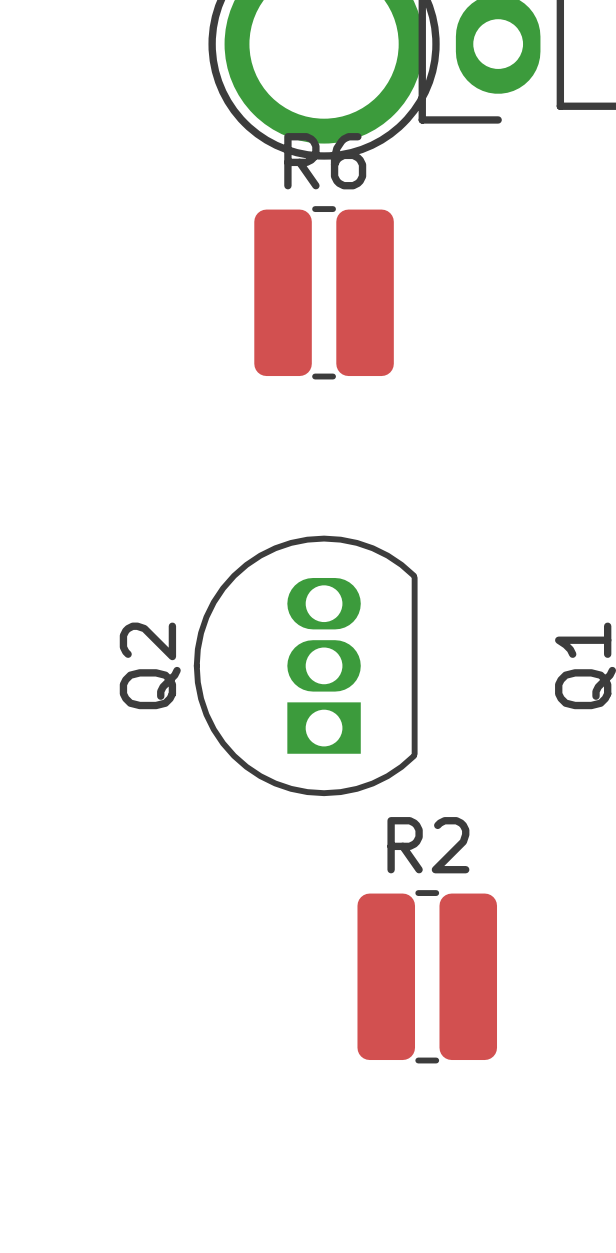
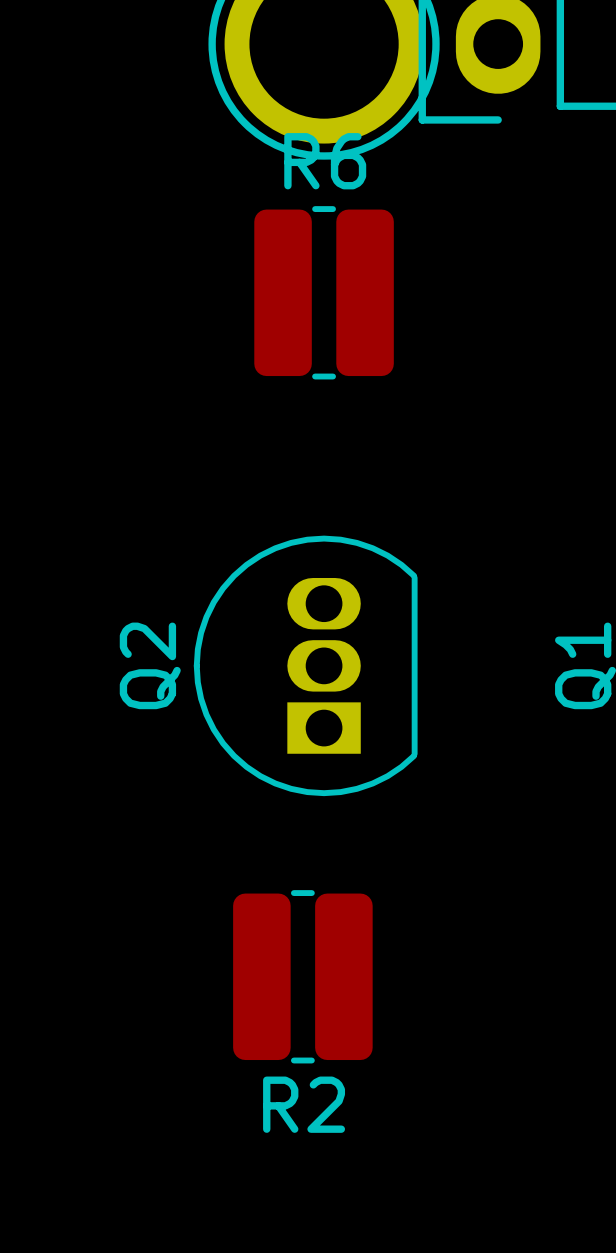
R2 name position: R2 (428, 845) -> R2 (304, 1104)
R2 position: (427, 976) -> (302, 976)

